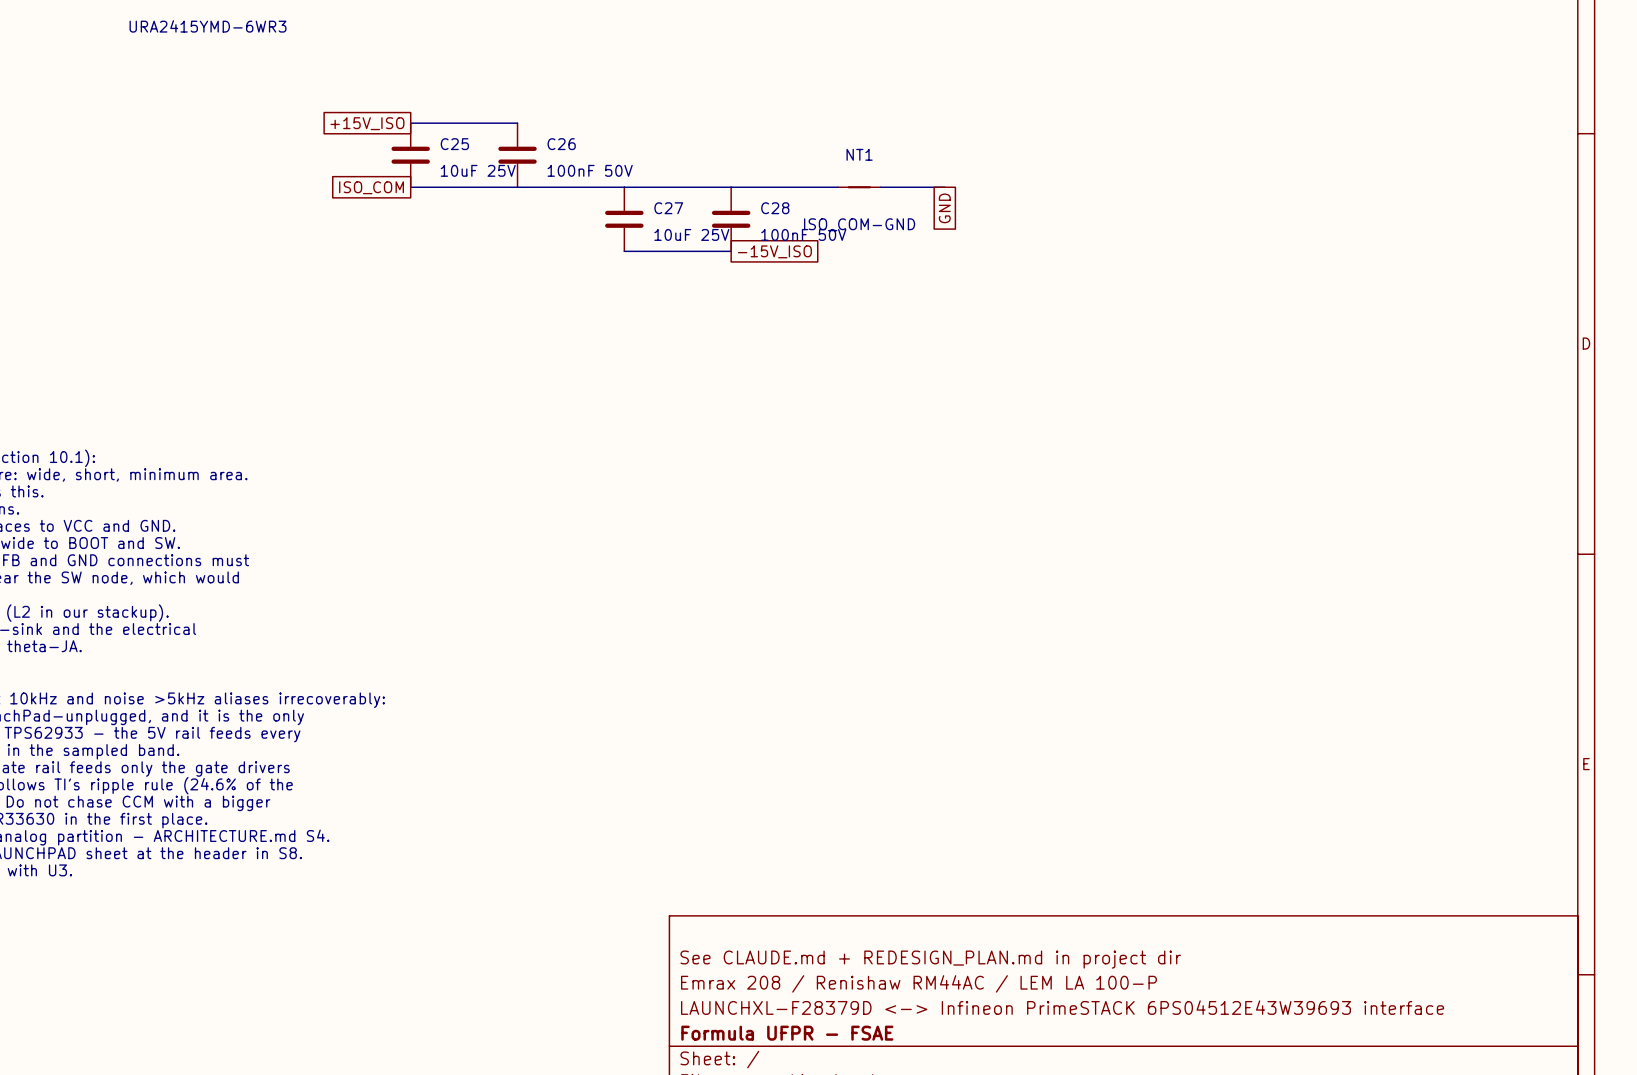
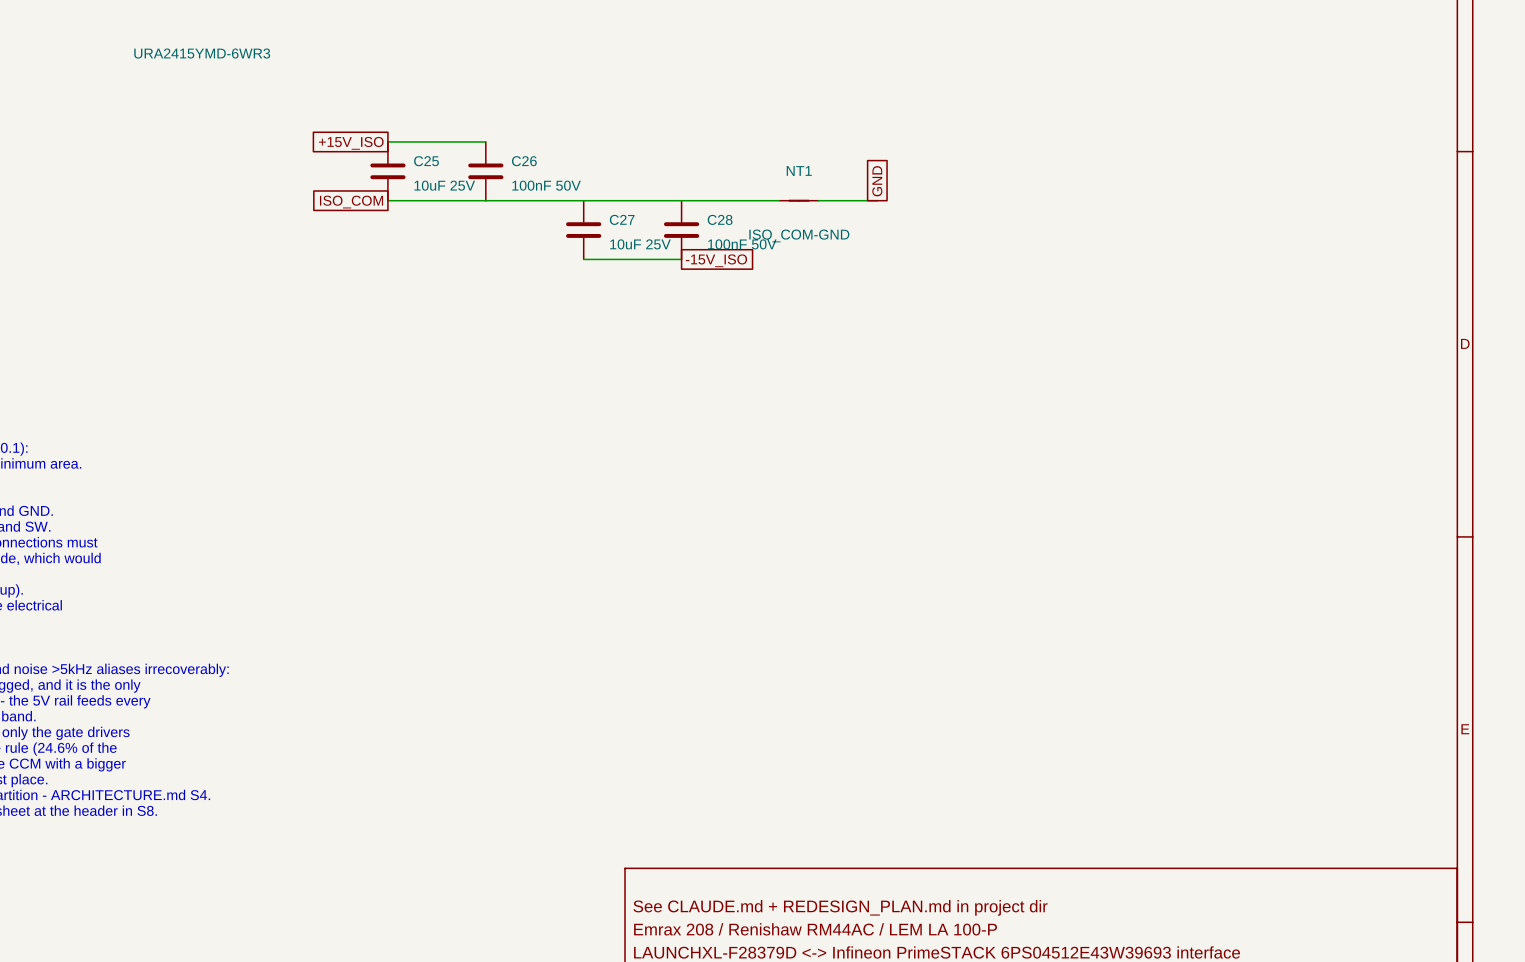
global label rotation: 0° (944, 208) -> 180° (877, 181)

